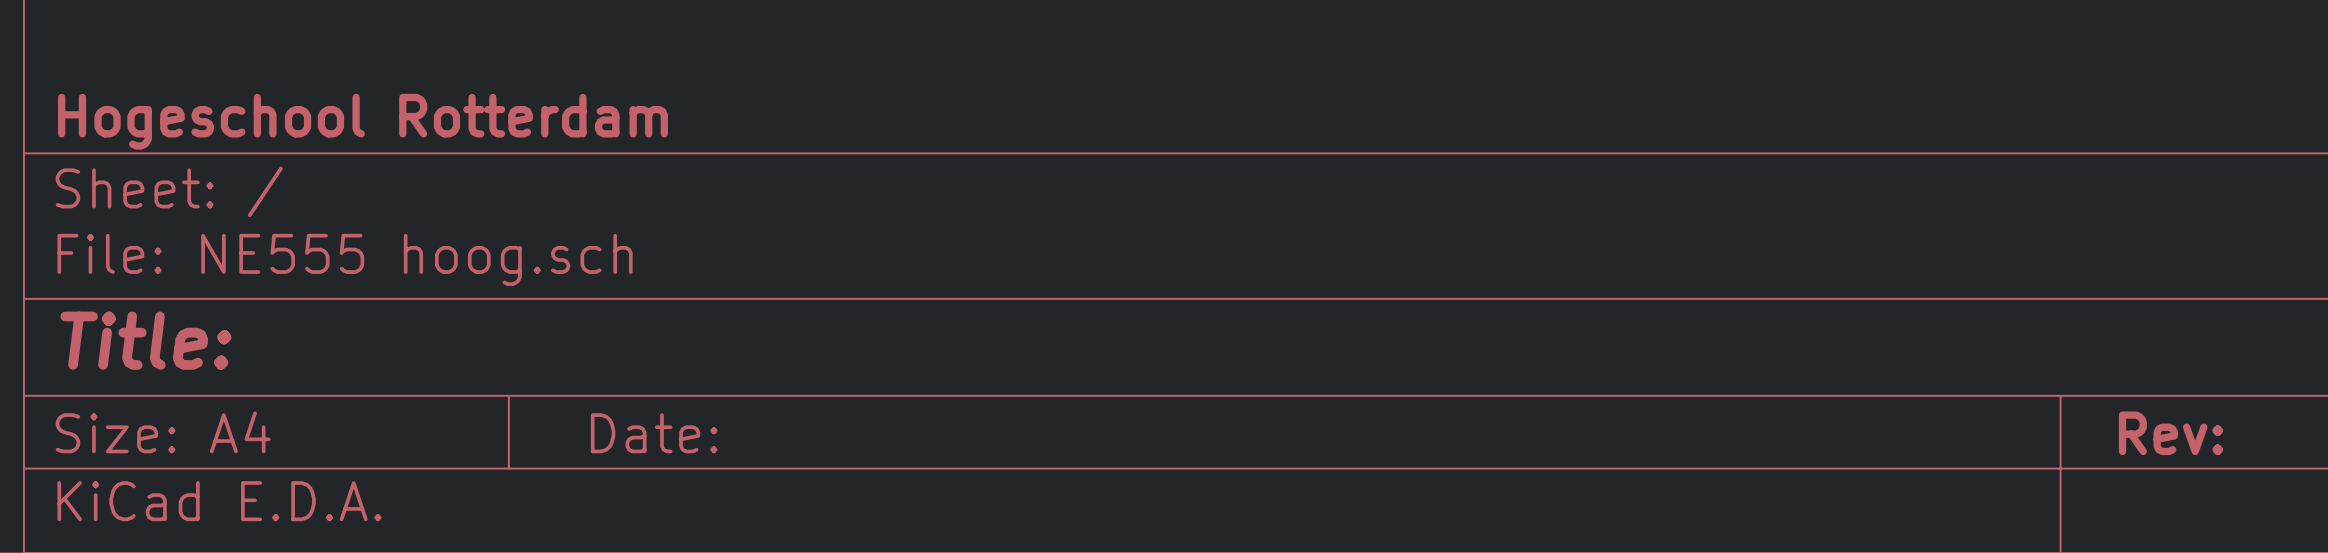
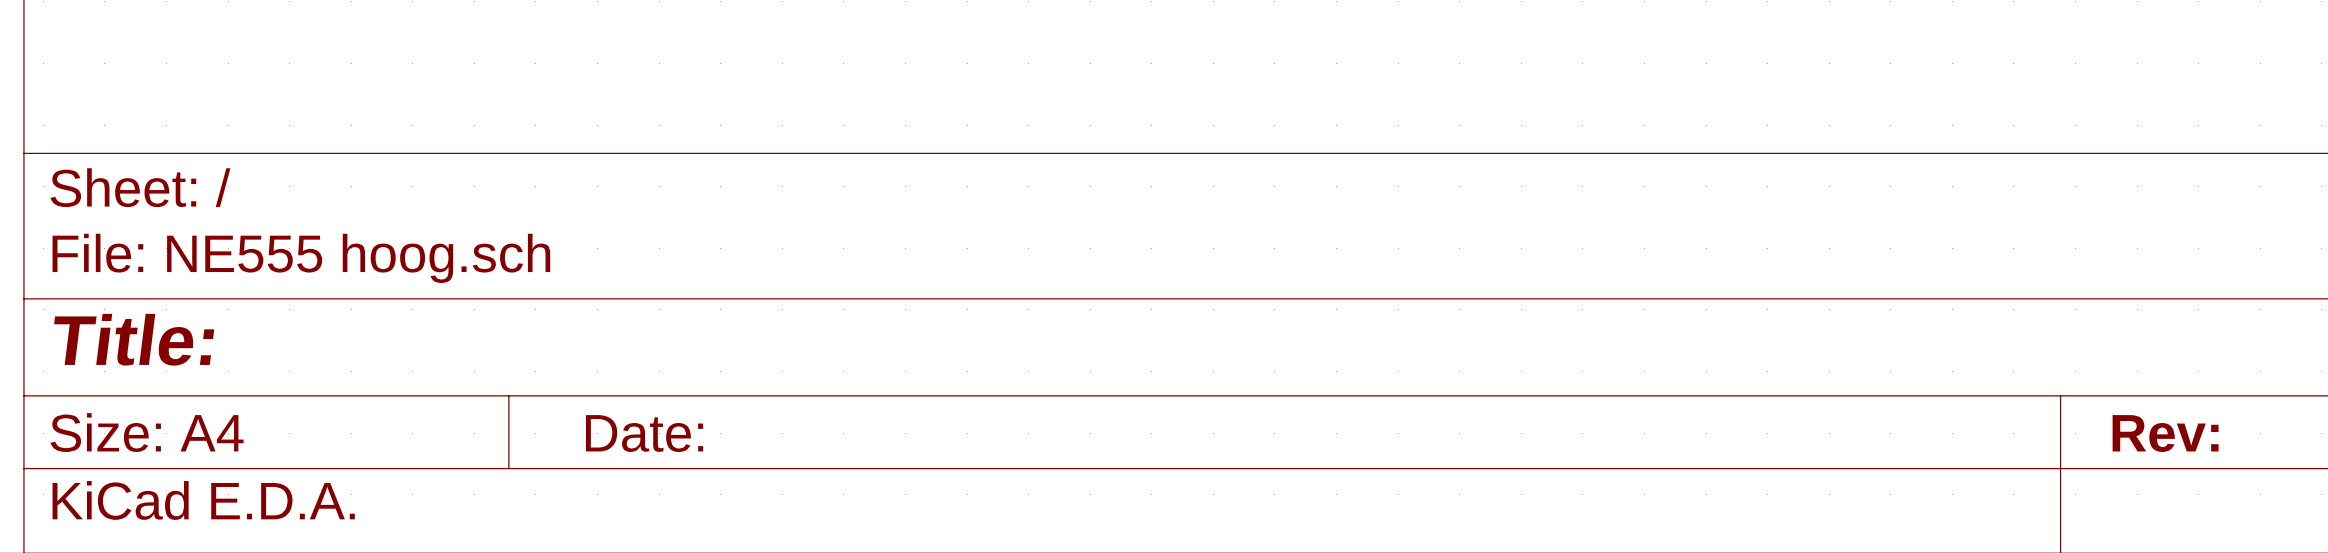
title block: Hogeschool Rotterdam (362, 121) -> none

